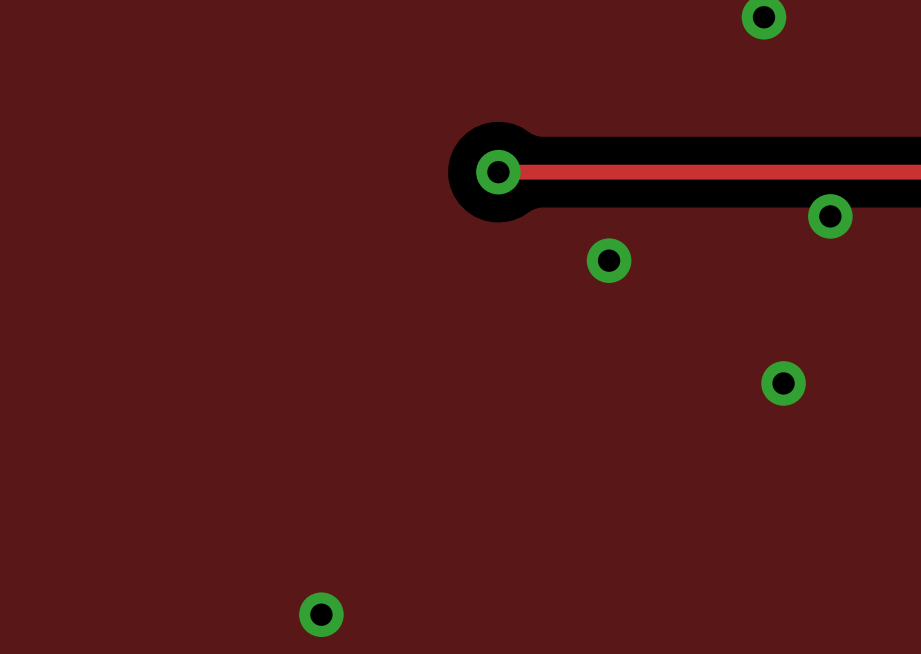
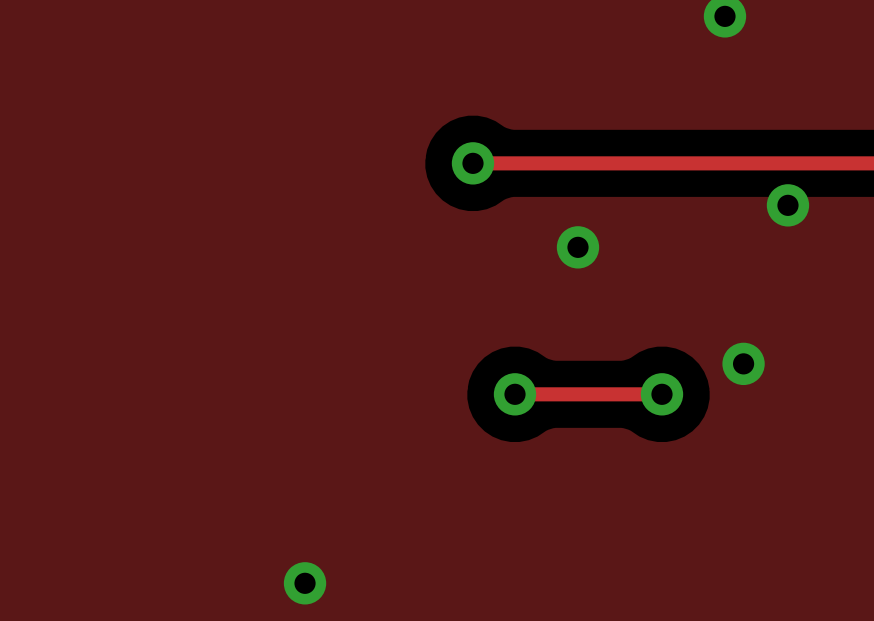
track: none -> (515, 394) (661, 394)
via: none -> (515, 394)
via: none -> (661, 394)

